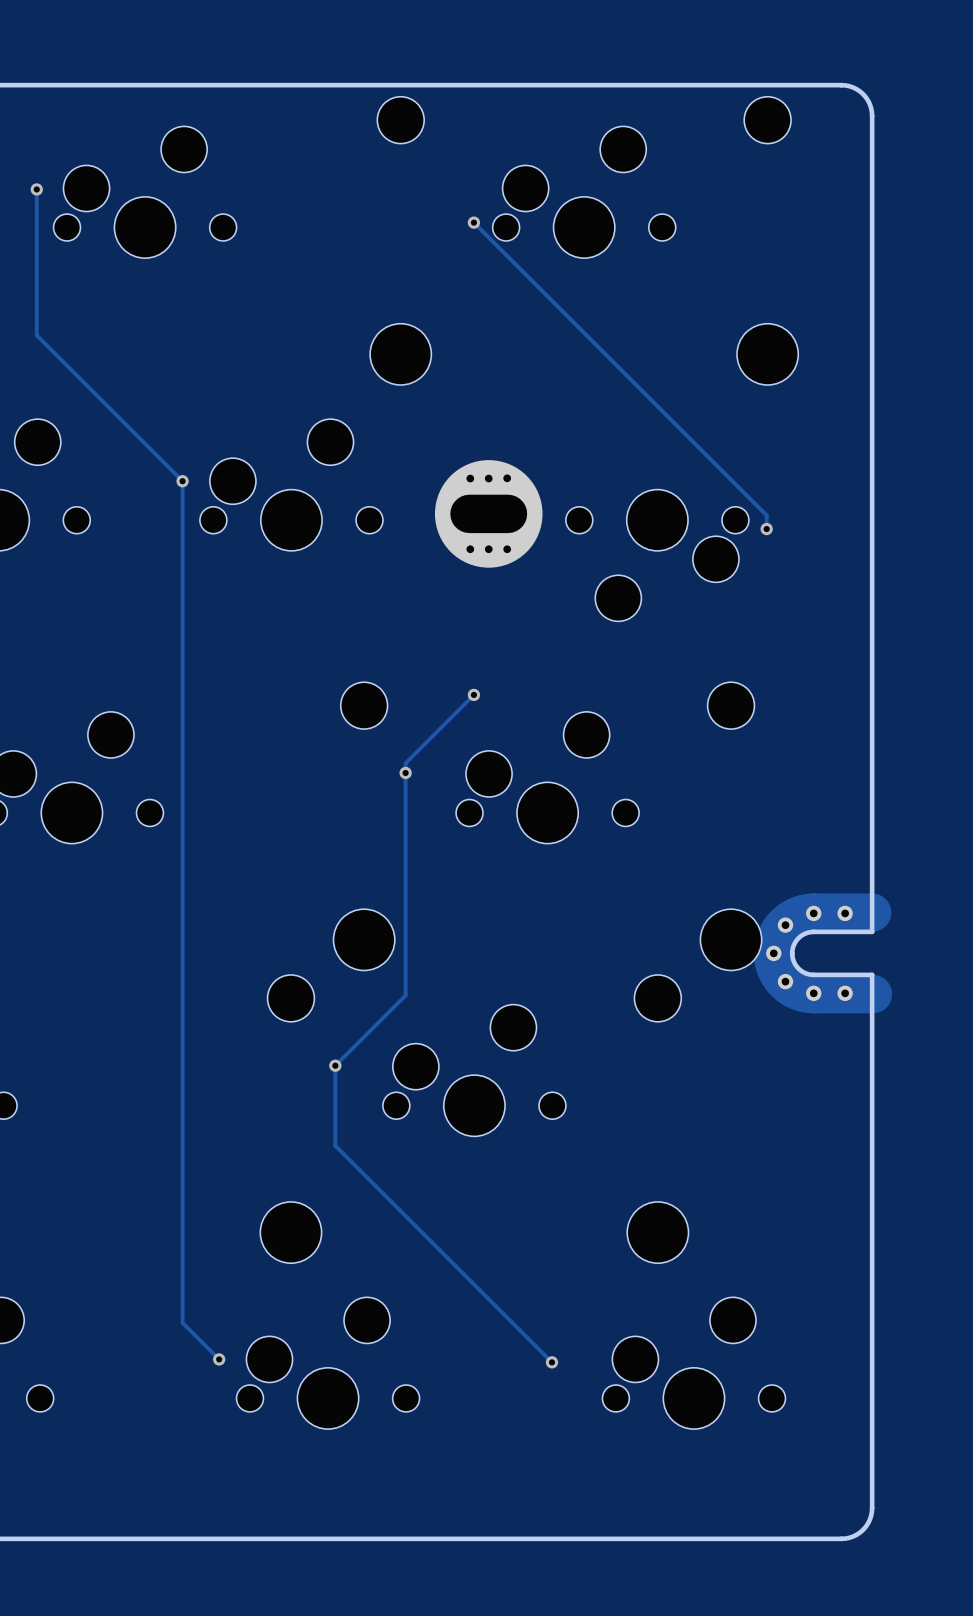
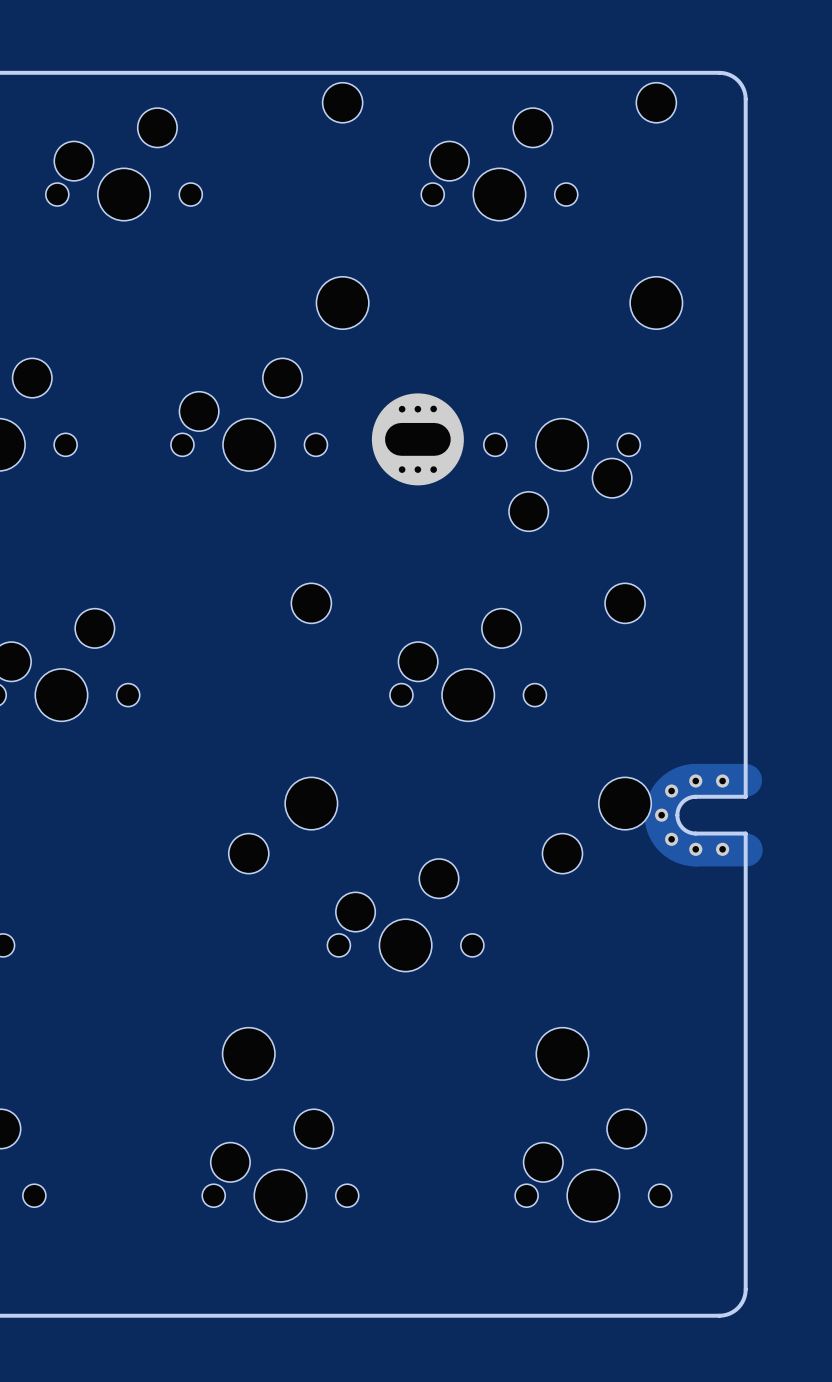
track: (36, 189) (36, 335) (182, 481) (182, 1322) (219, 1359) -> none
via: (36, 189) -> none
track: (473, 222) (766, 515) (766, 529) -> none
via: (473, 222) -> none
via: (182, 481) -> none
via: (766, 529) -> none
track: (473, 694) (405, 763) (405, 995) (335, 1065) (335, 1145) (551, 1362) -> none
via: (473, 694) -> none
via: (405, 772) -> none
via: (335, 1065) -> none
via: (219, 1359) -> none
via: (551, 1362) -> none

